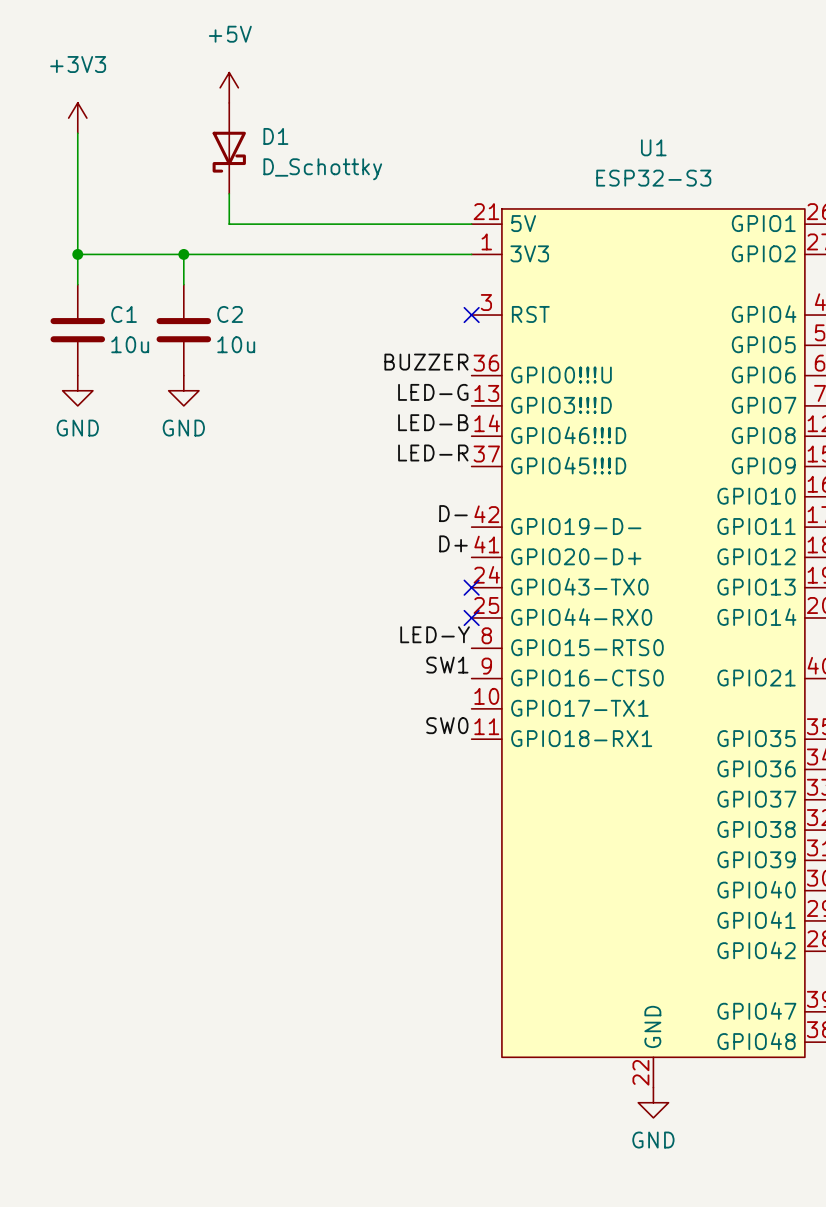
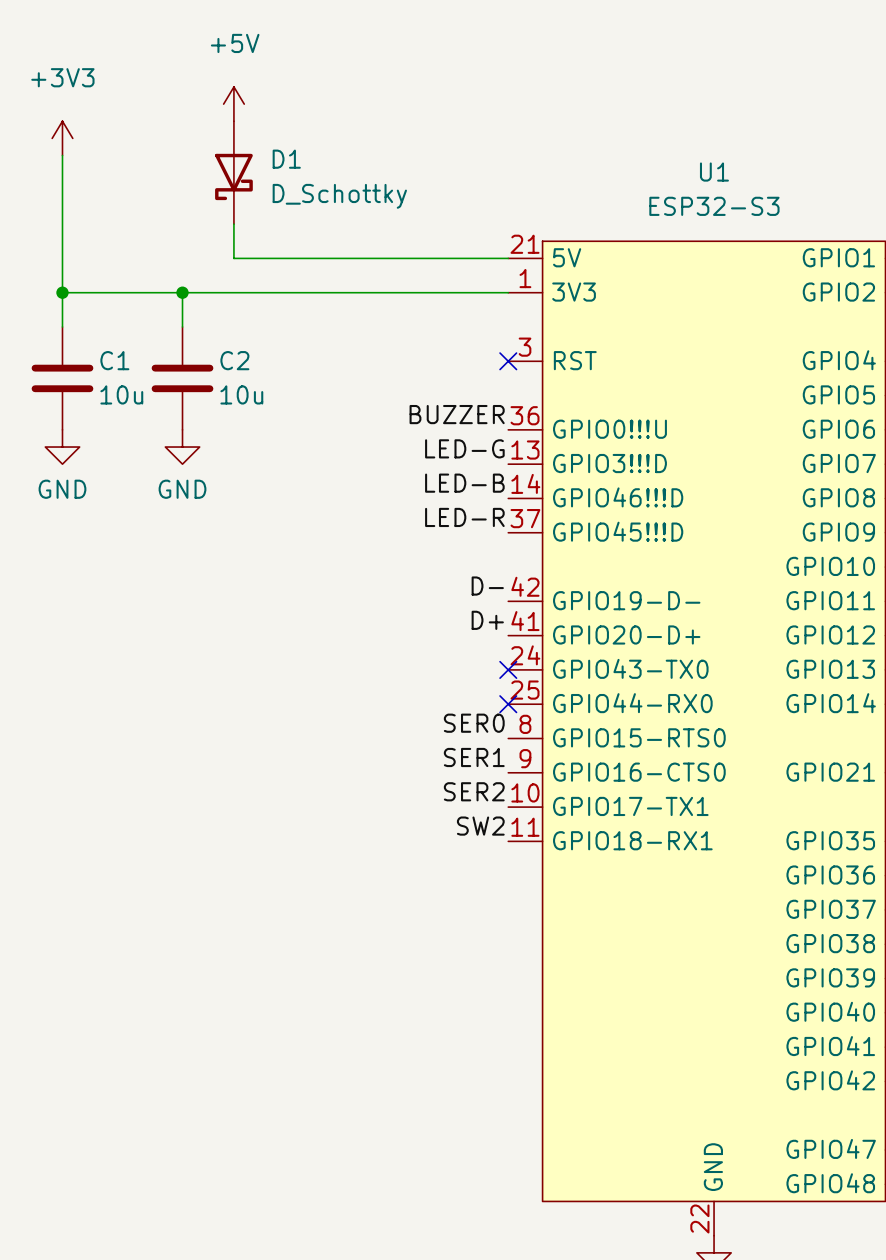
label: LED-Y (435, 634) -> SER0 (474, 723)
label: SW1 (447, 665) -> SER1 (474, 757)
label: none -> SER2 (474, 791)
label: SW0 (447, 725) -> SW2 (480, 826)

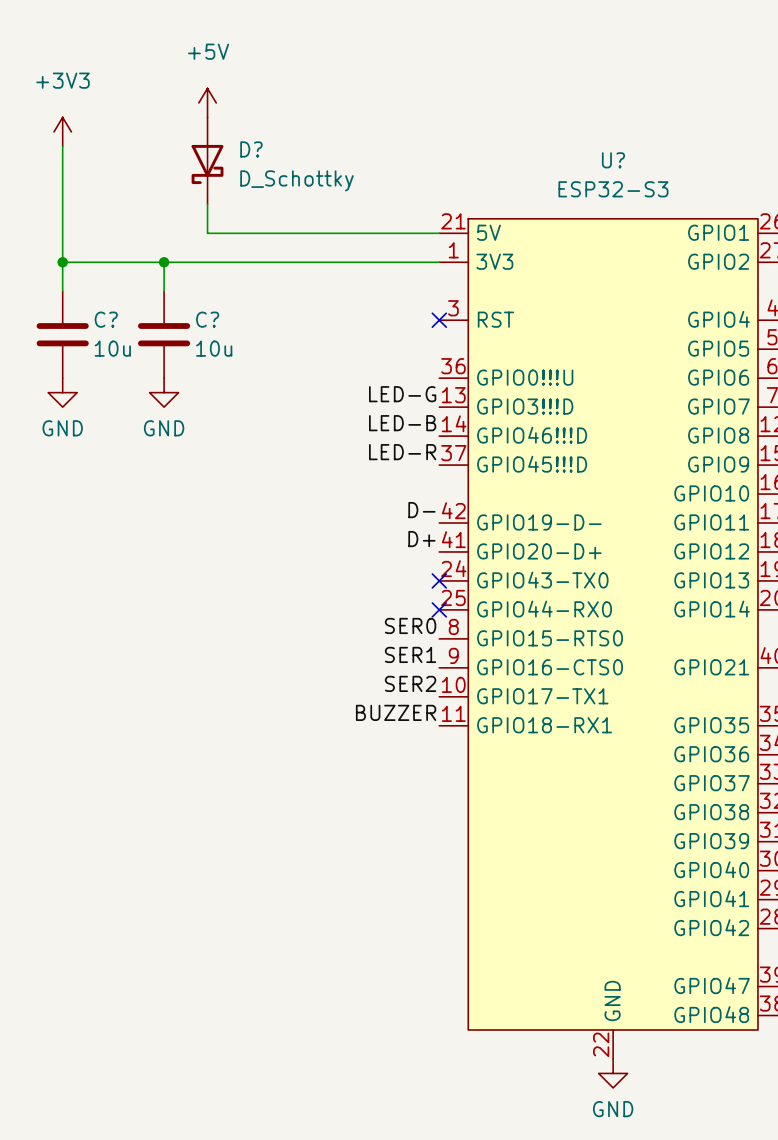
D1 name: D1 (286, 159) -> D? (251, 149)
U1 name: U1 (714, 172) -> U? (613, 160)
C1 name: C1 (114, 360) -> C? (106, 319)
C2 name: C2 (234, 360) -> C? (207, 319)
label: BUZZER (457, 414) -> none
label: SW2 (480, 826) -> BUZZER (396, 712)

